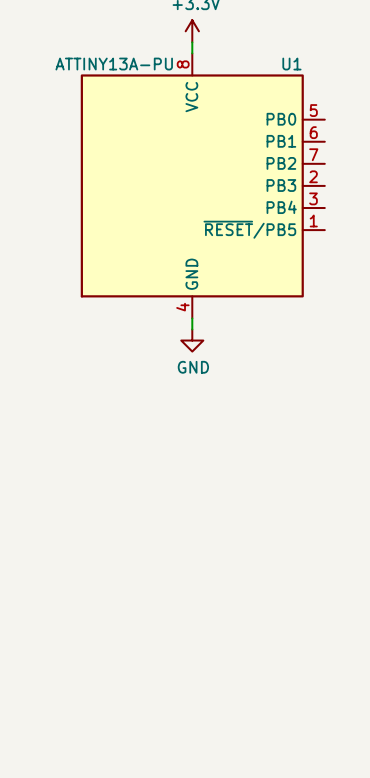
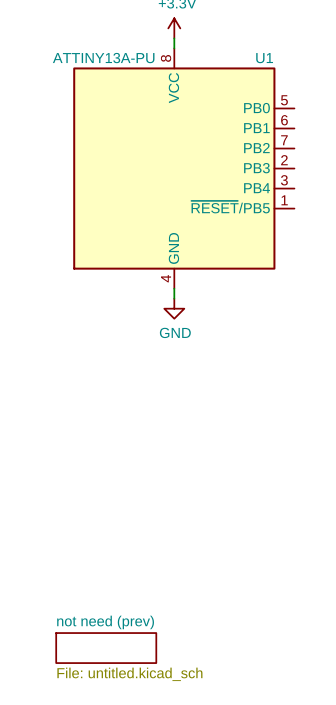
sheet not need (prev): none -> File: untitled.kicad_sch (106, 648)

